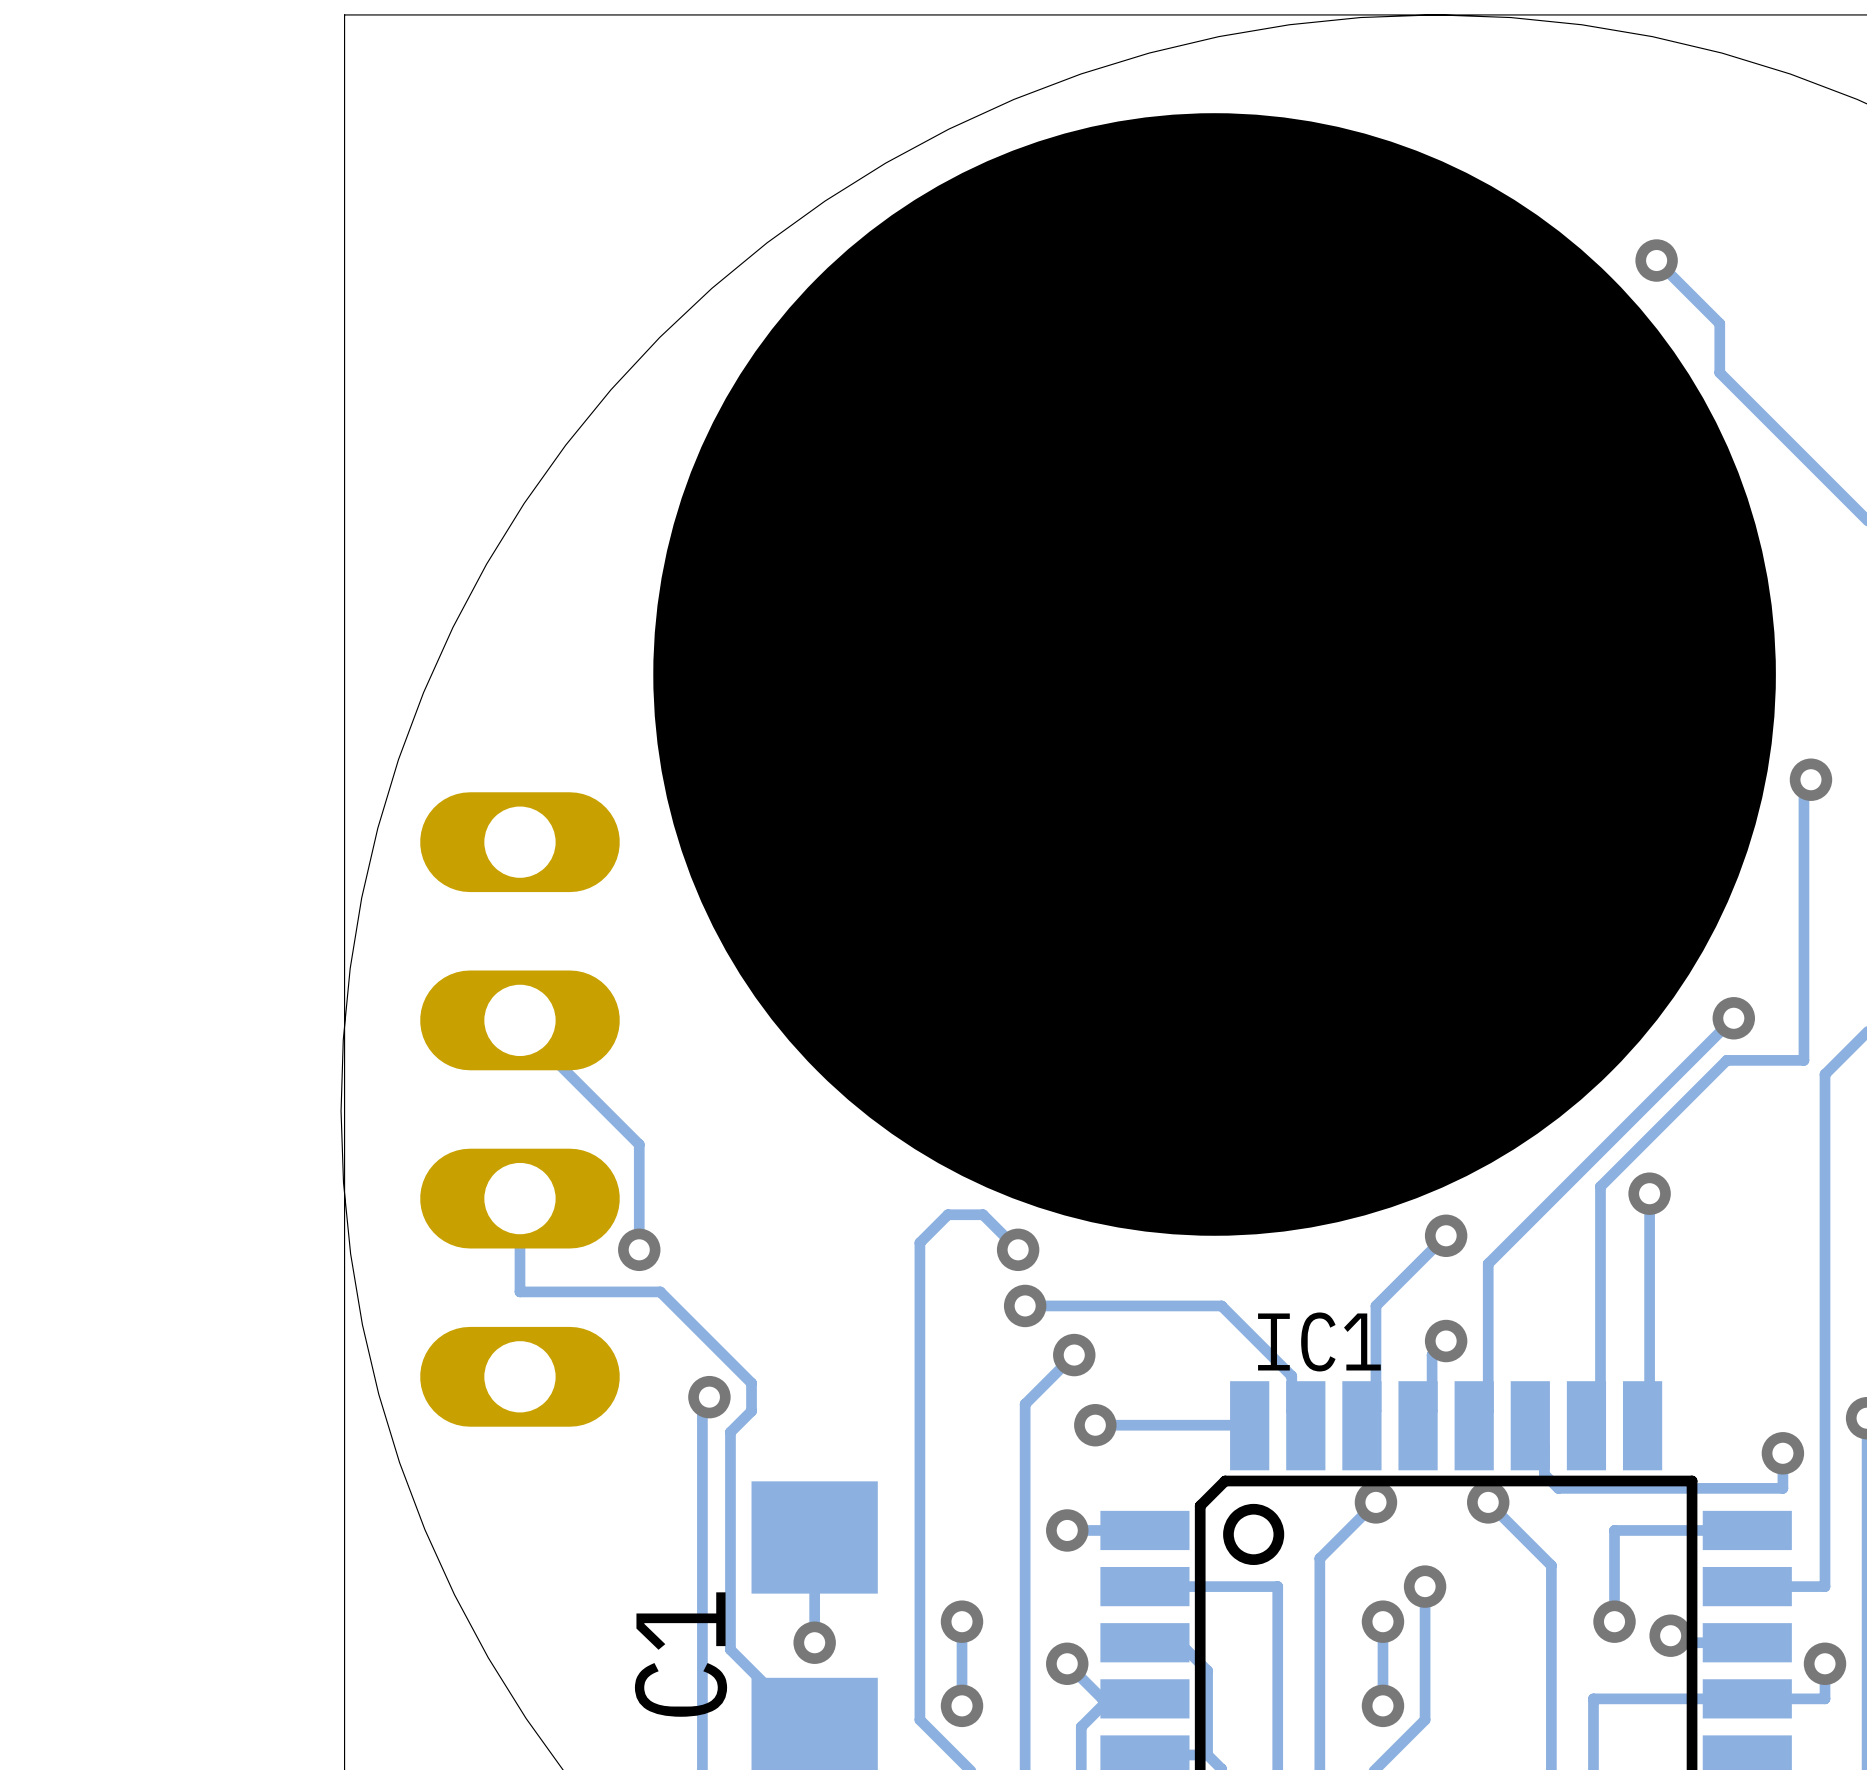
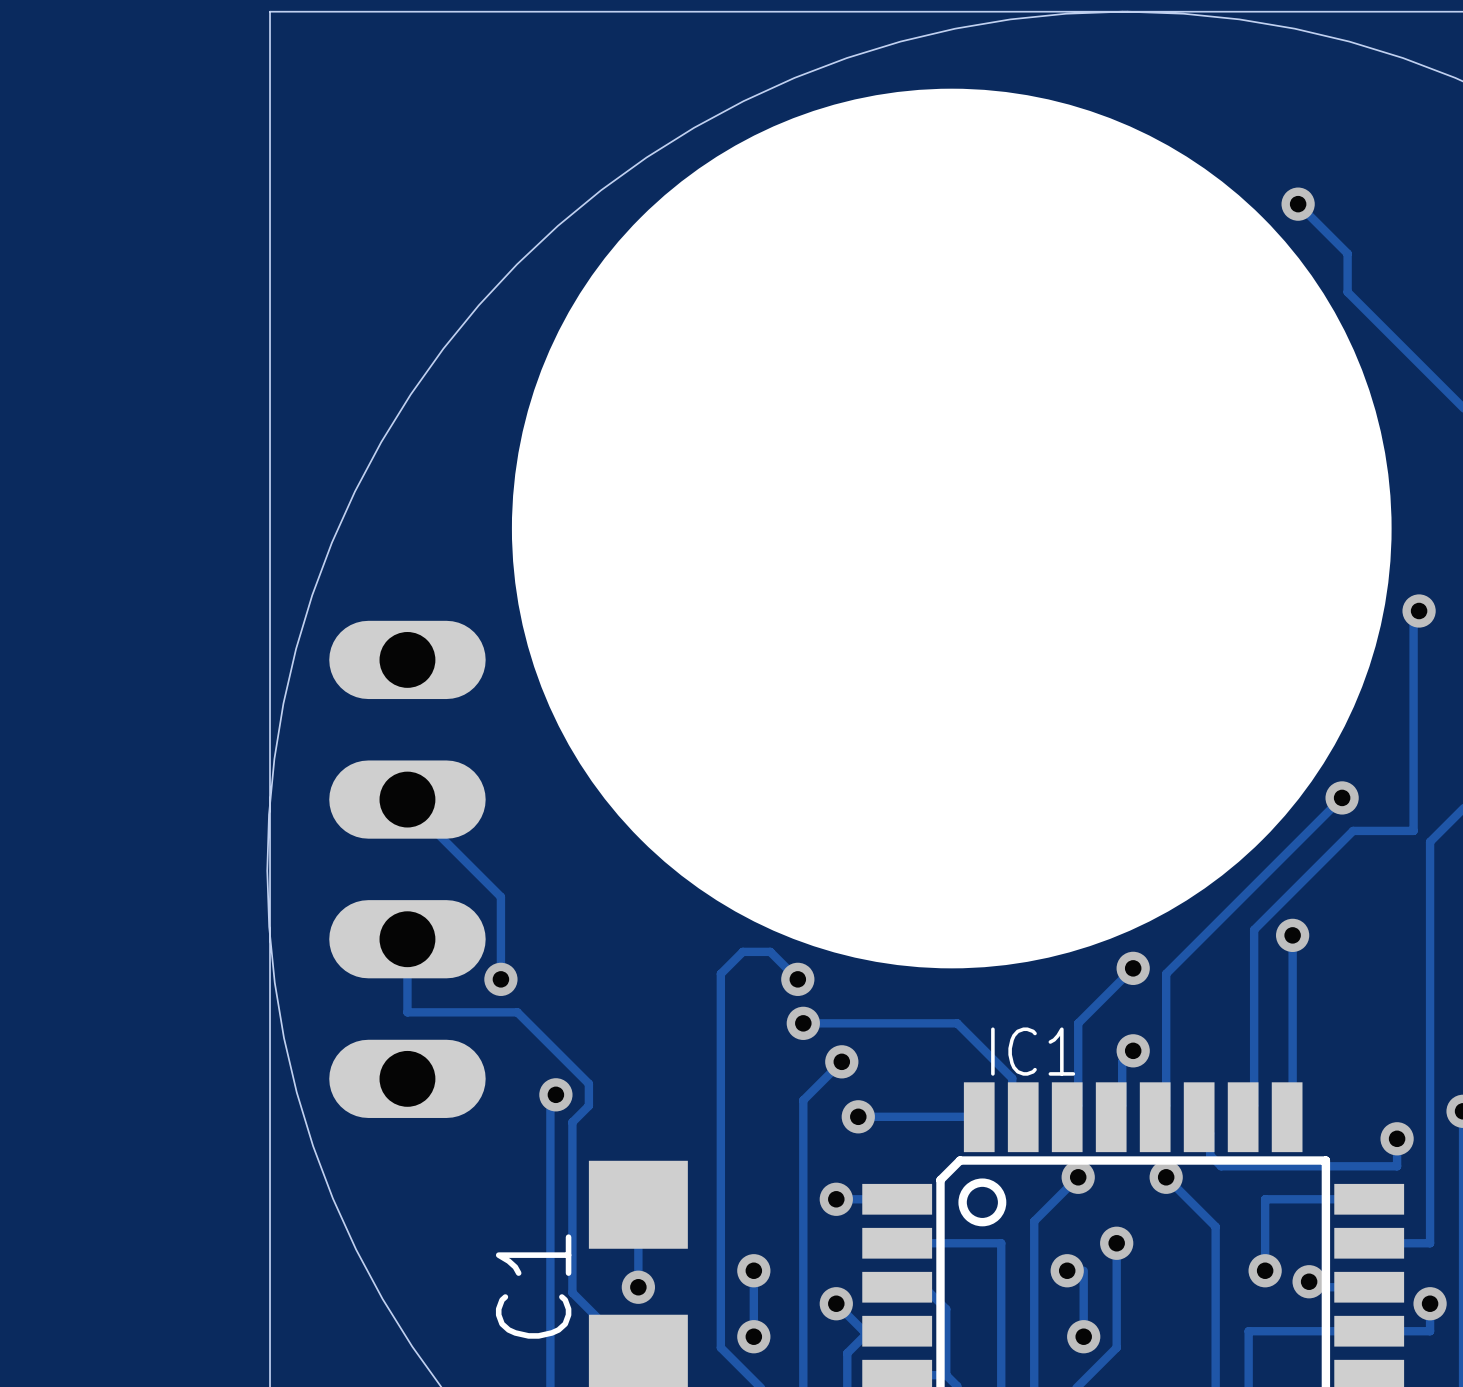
track: (1733, 1018) (1488, 1263) -> (1342, 797) (1166, 973) (1166, 990)
via position: (1733, 1018) -> (1342, 797)
via position: (1382, 1621) -> (1067, 1270)

